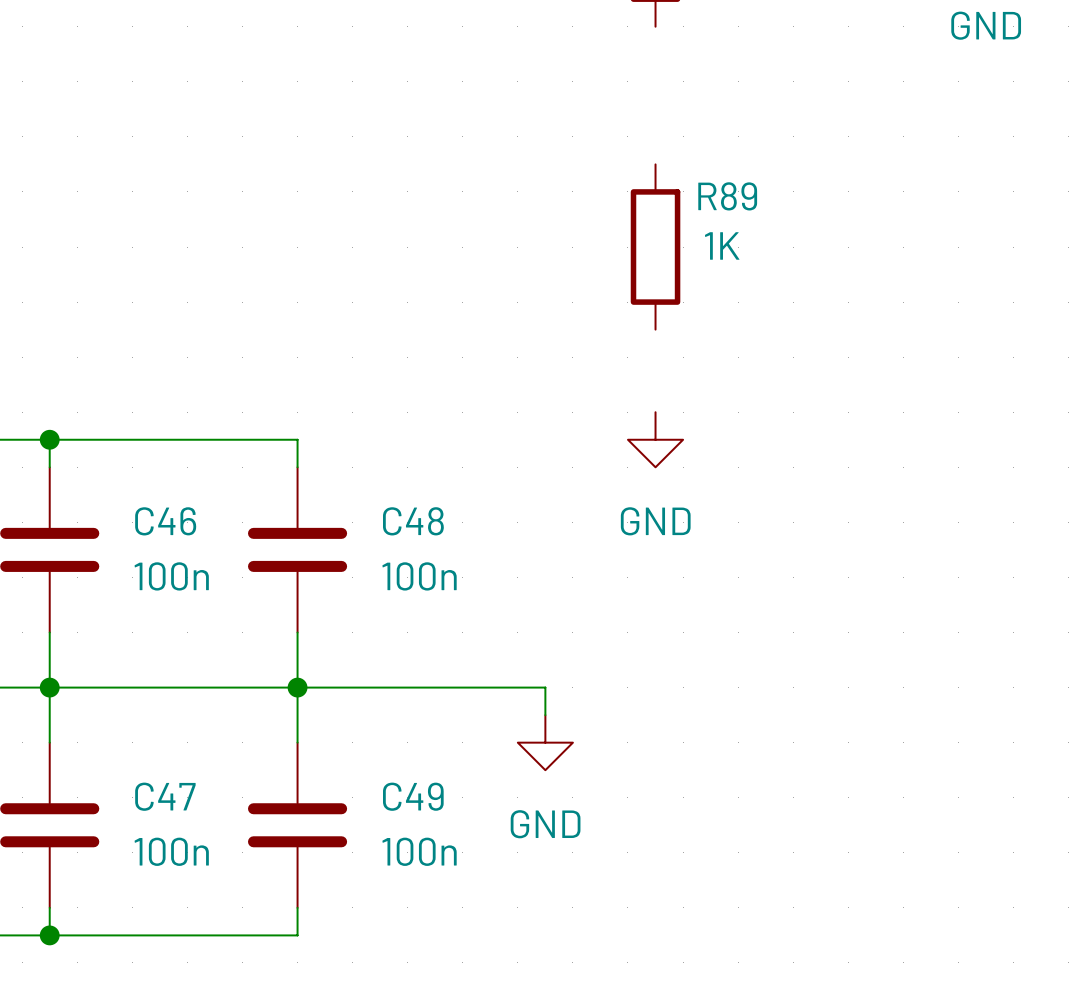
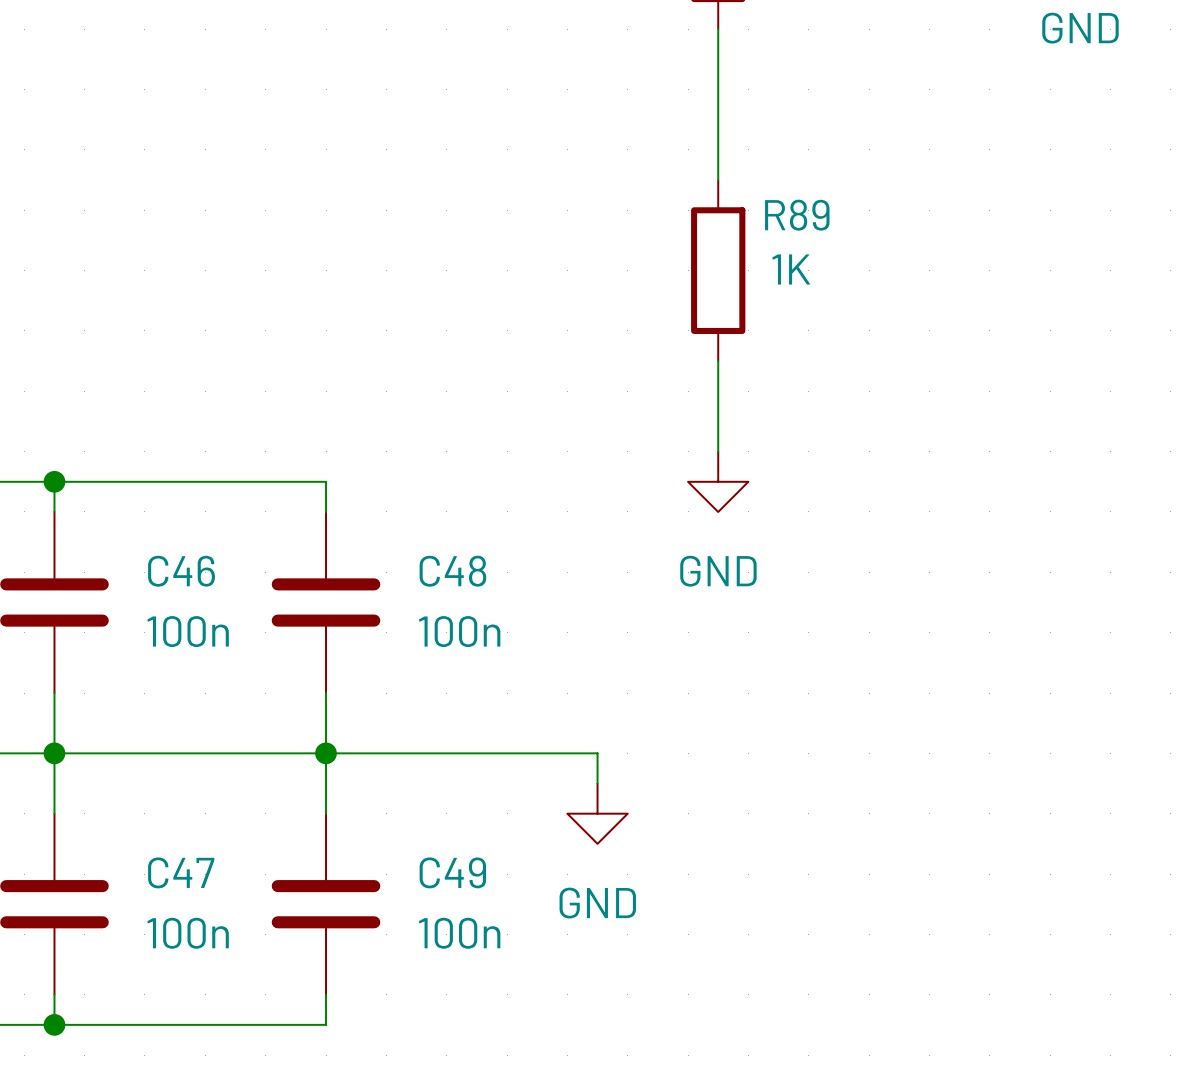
wire: none -> (718, 29) (718, 180)
wire: none -> (718, 361) (718, 451)

